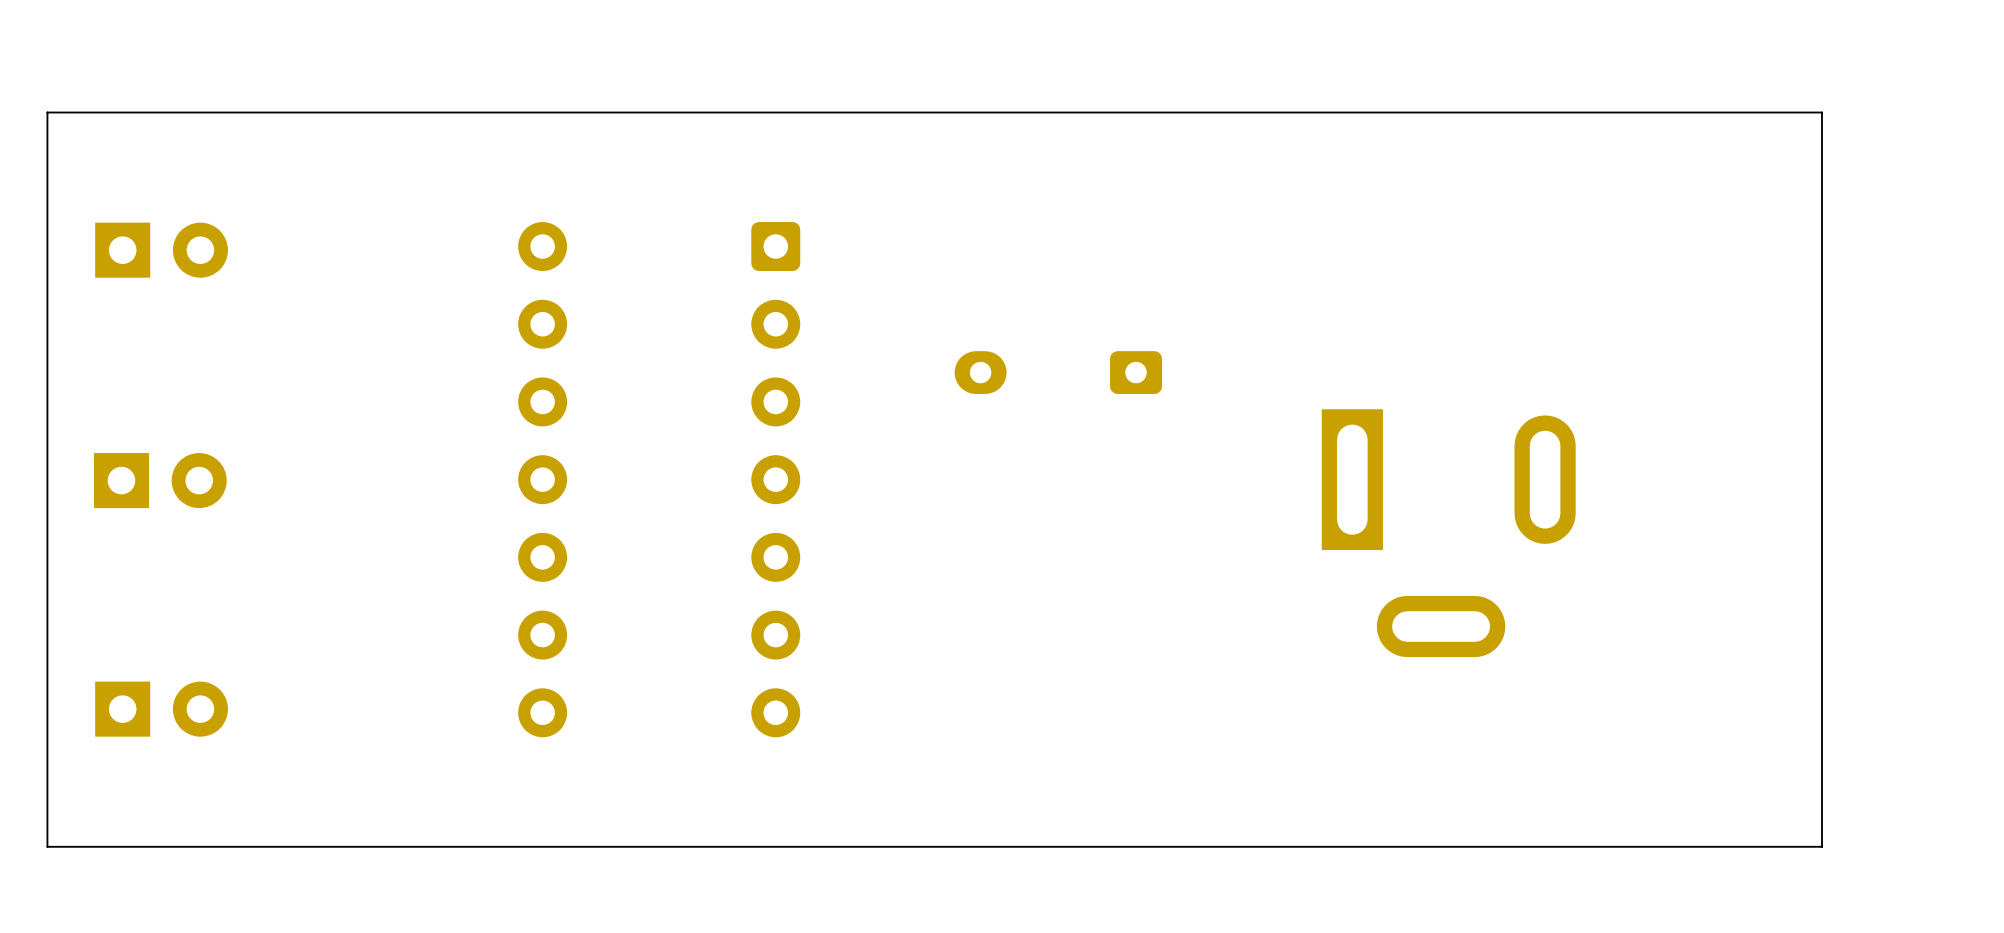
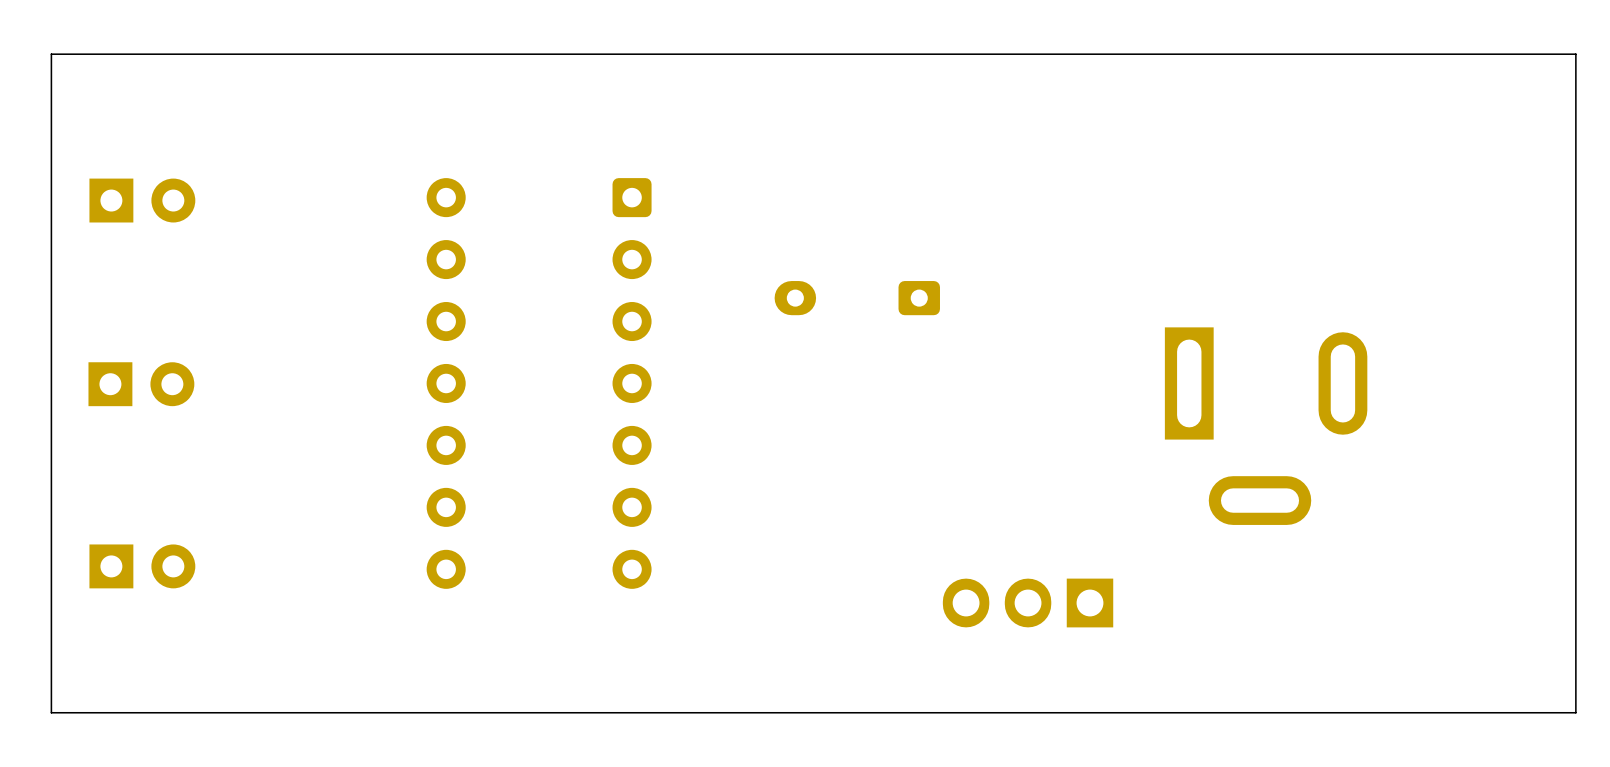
board edge: (47, 112) (1821, 112) (1821, 846) (47, 846) -> (51, 90) (51, 54) (1575, 54) (1575, 712) (51, 712) (51, 676)
part position: (1448, 533) -> (1266, 426)
part: none -> (1028, 603)

